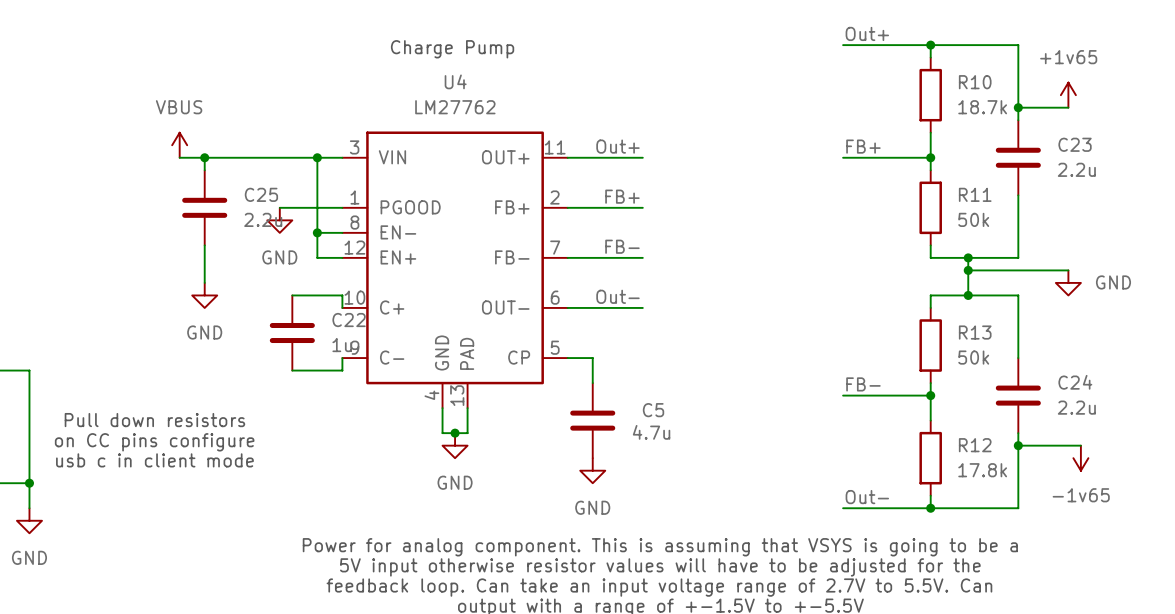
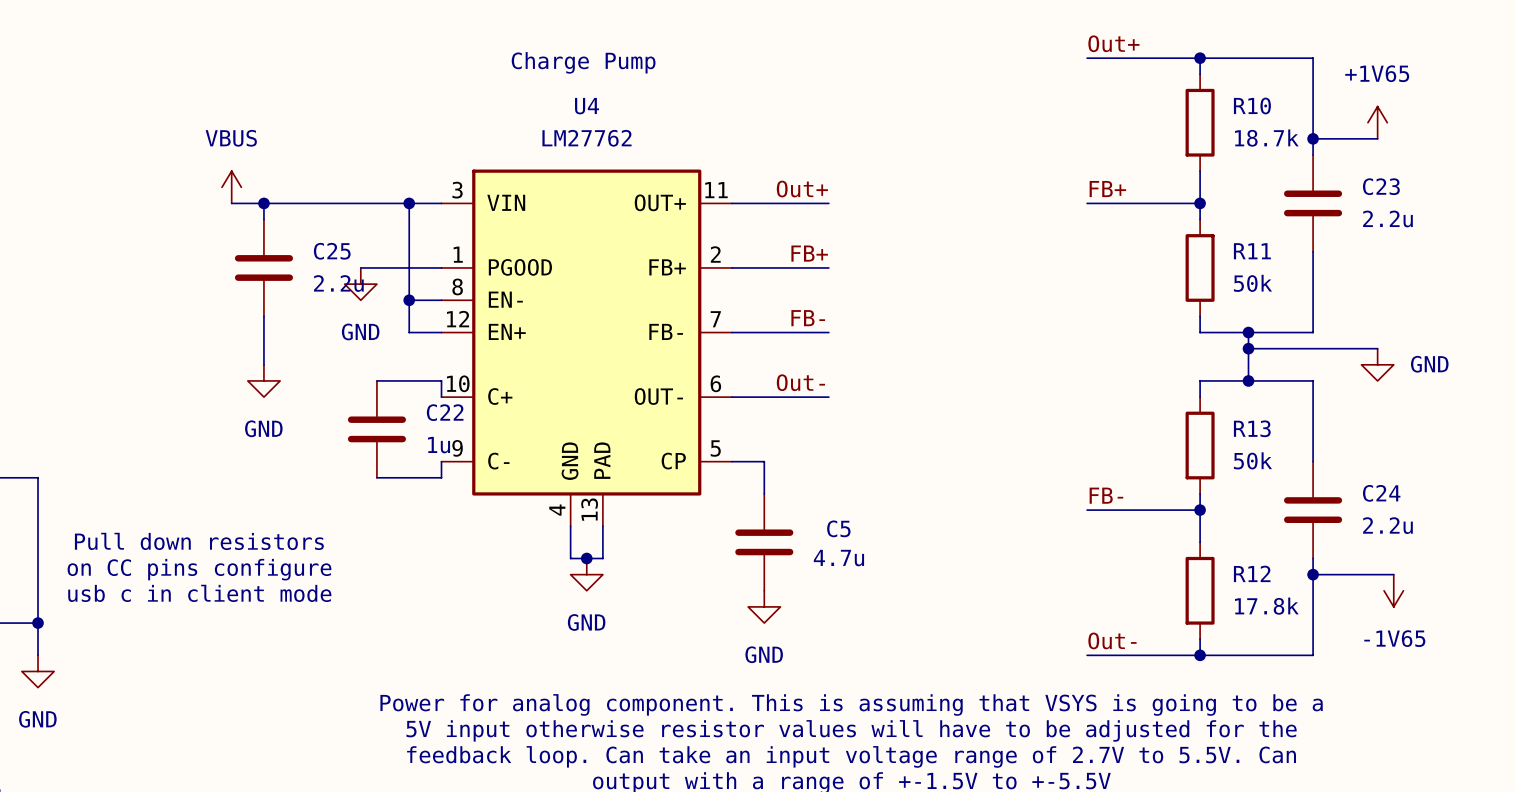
power symbol: +1v65 (1068, 95) -> +1V65 (1377, 122)
power symbol: -1v65 (1080, 458) -> -1V65 (1393, 590)

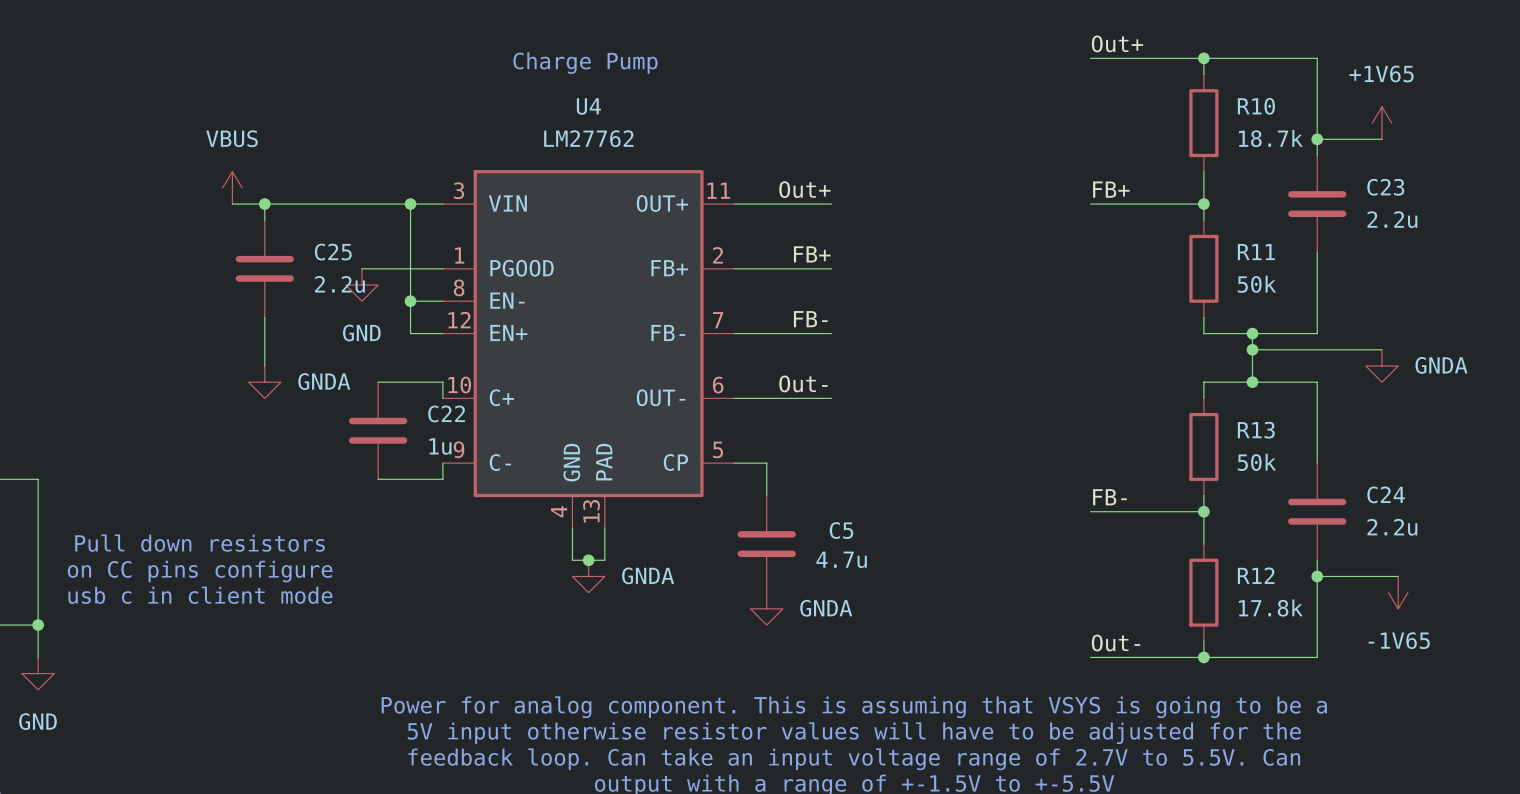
power symbol: GND (1377, 364) -> GNDA (1382, 365)
power symbol: GND (263, 380) -> GNDA (264, 382)
power symbol: GND (586, 574) -> GNDA (588, 576)
power symbol: GND (764, 606) -> GNDA (766, 608)

